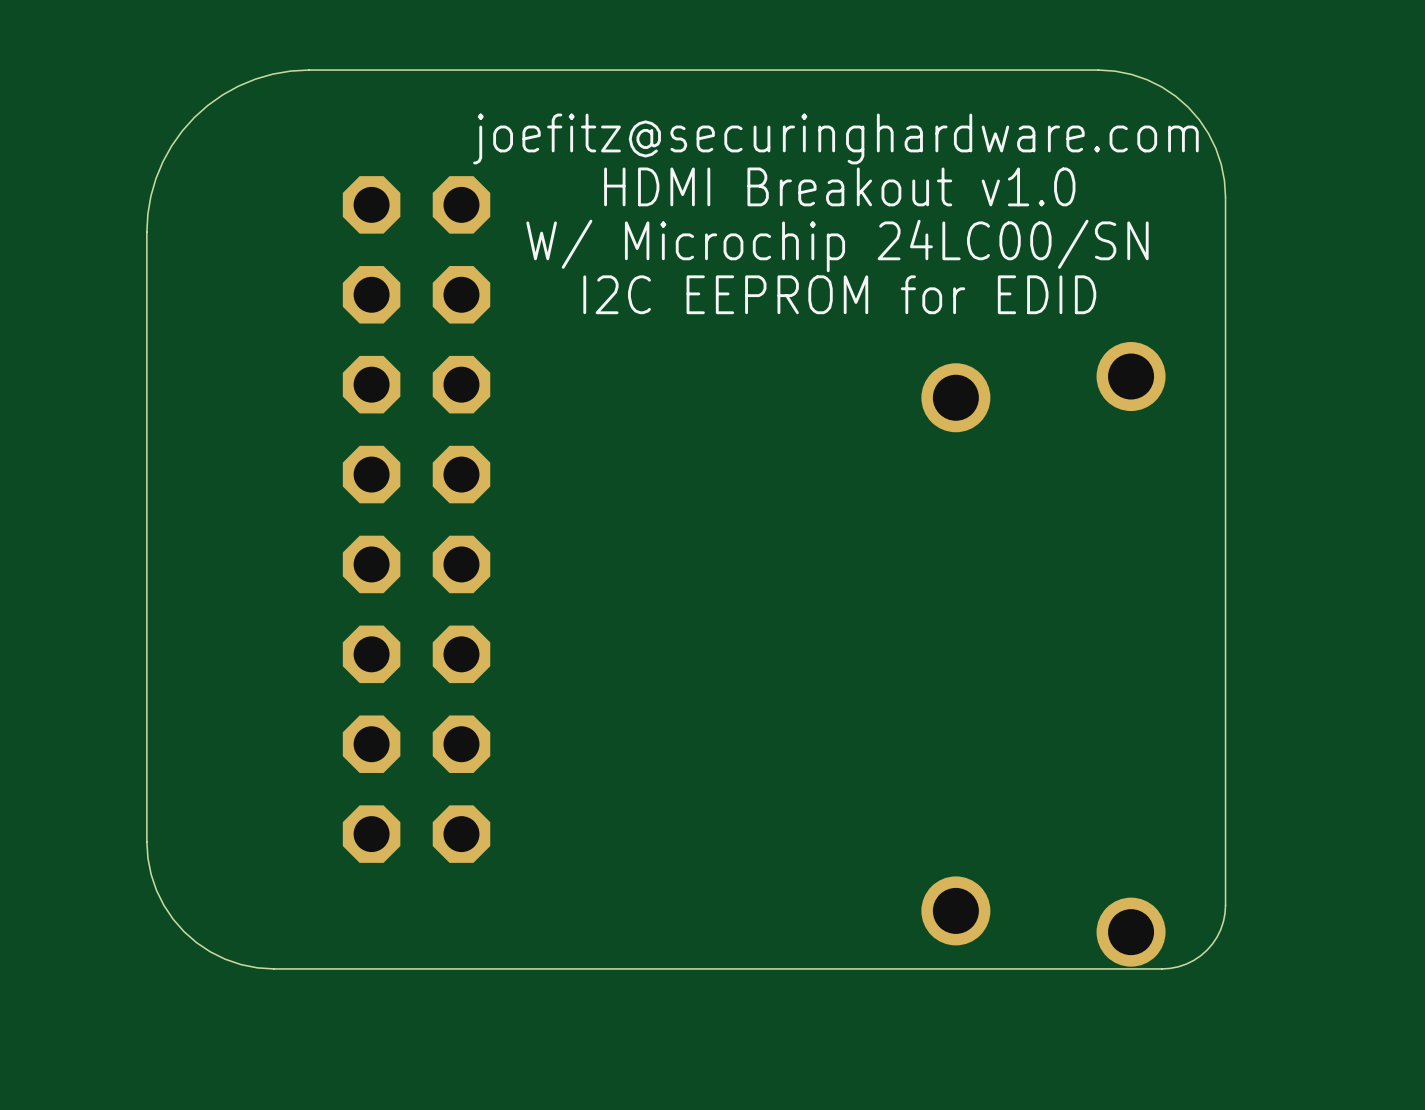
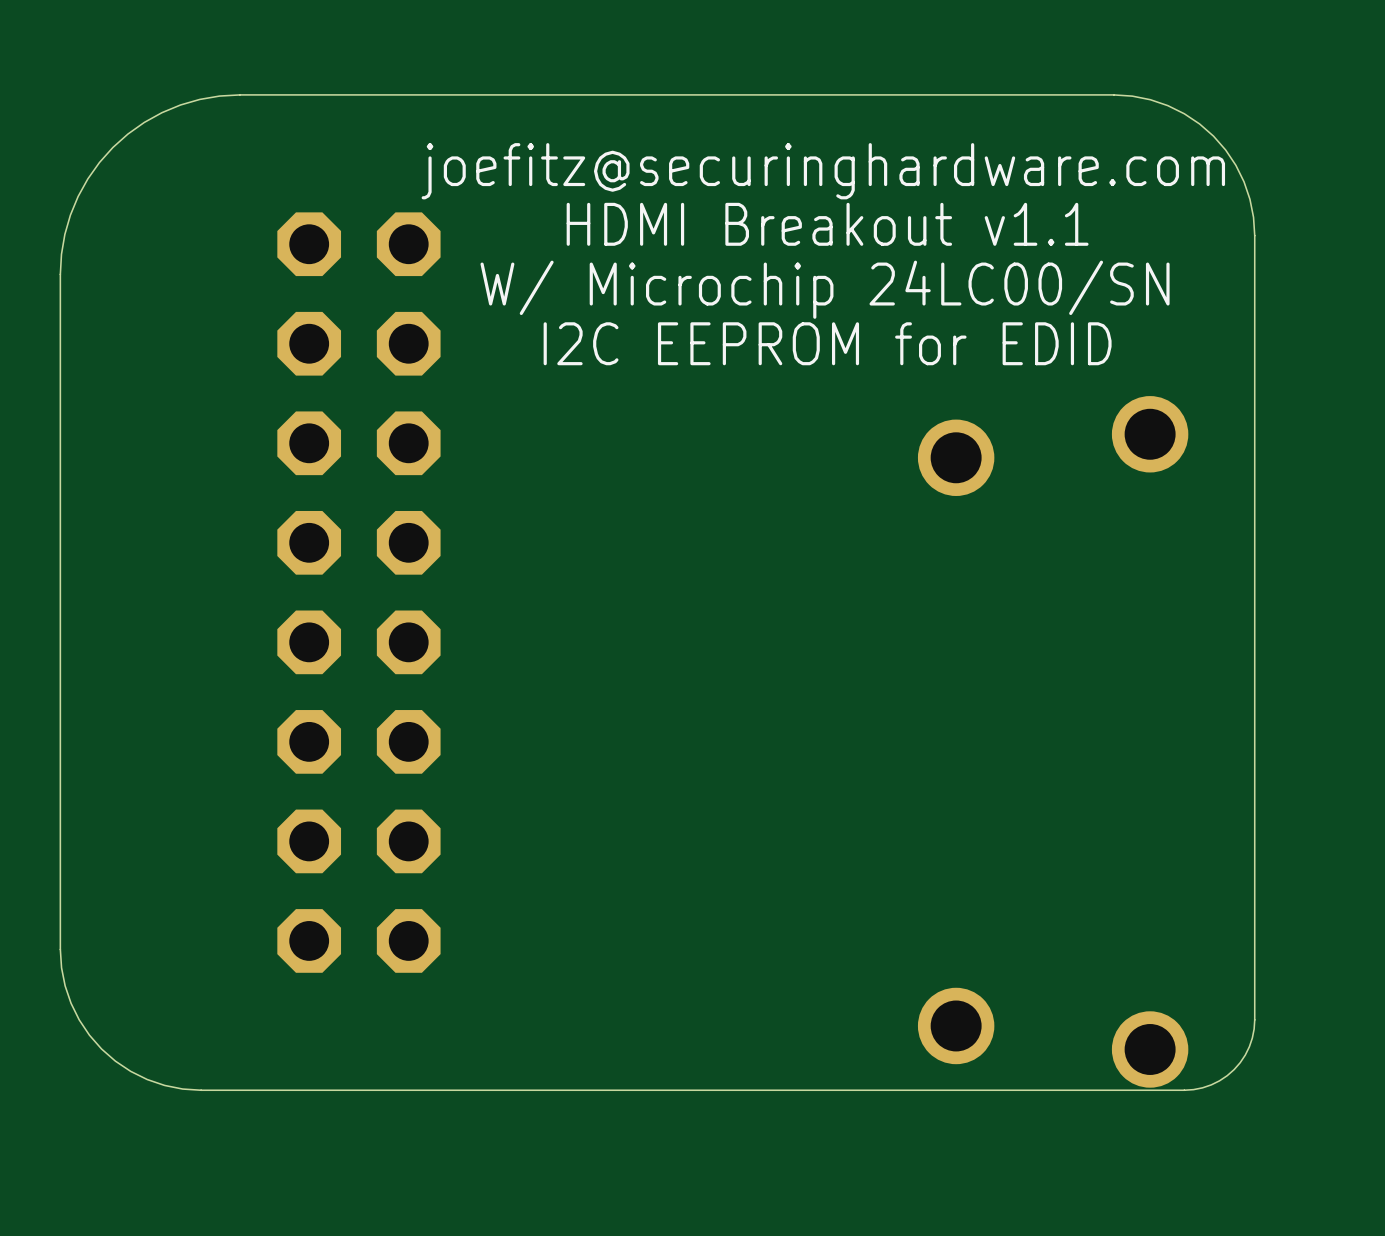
text: HDMI Breakout v1.0 (839, 186) -> HDMI Breakout v1.1 (827, 224)

